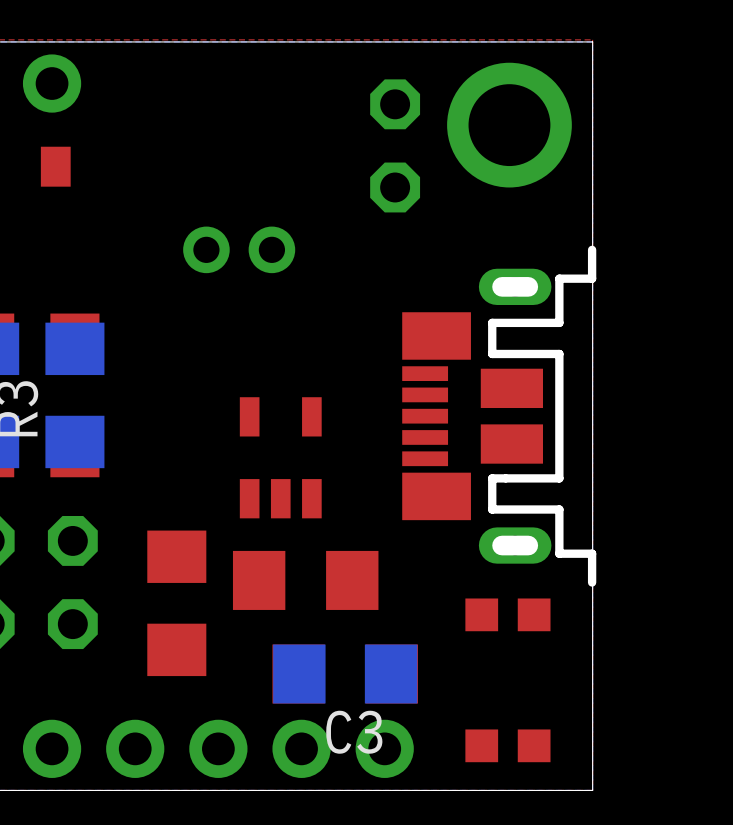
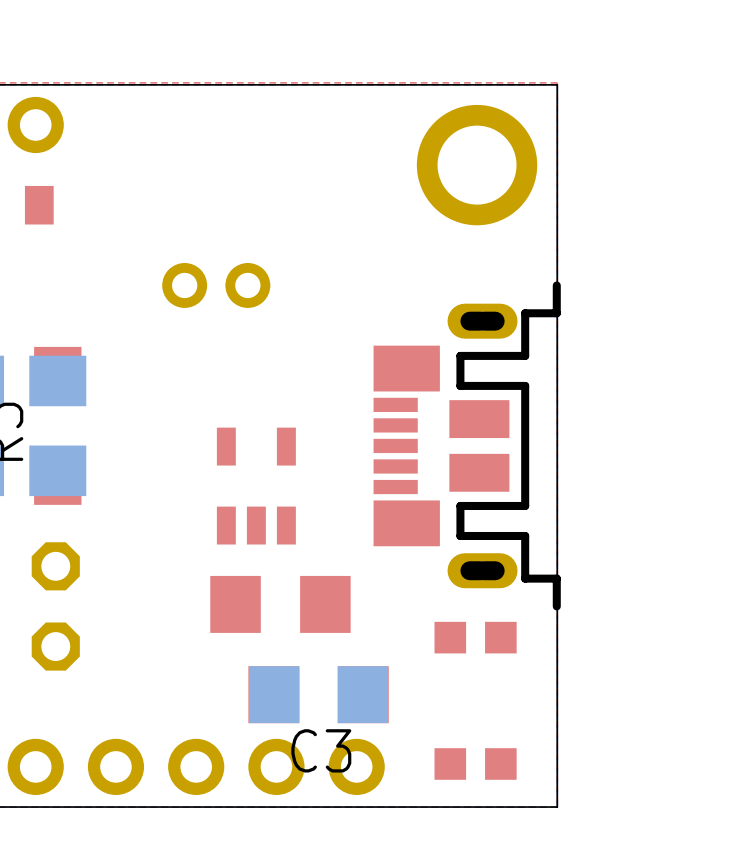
part: (395, 145) -> none
part: (176, 603) -> none

